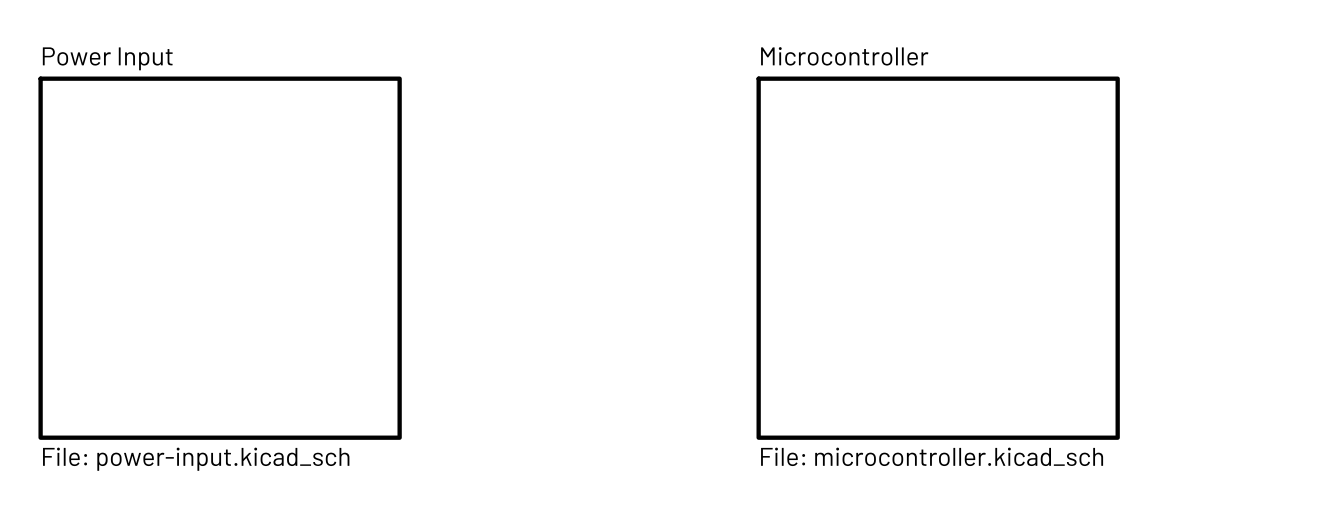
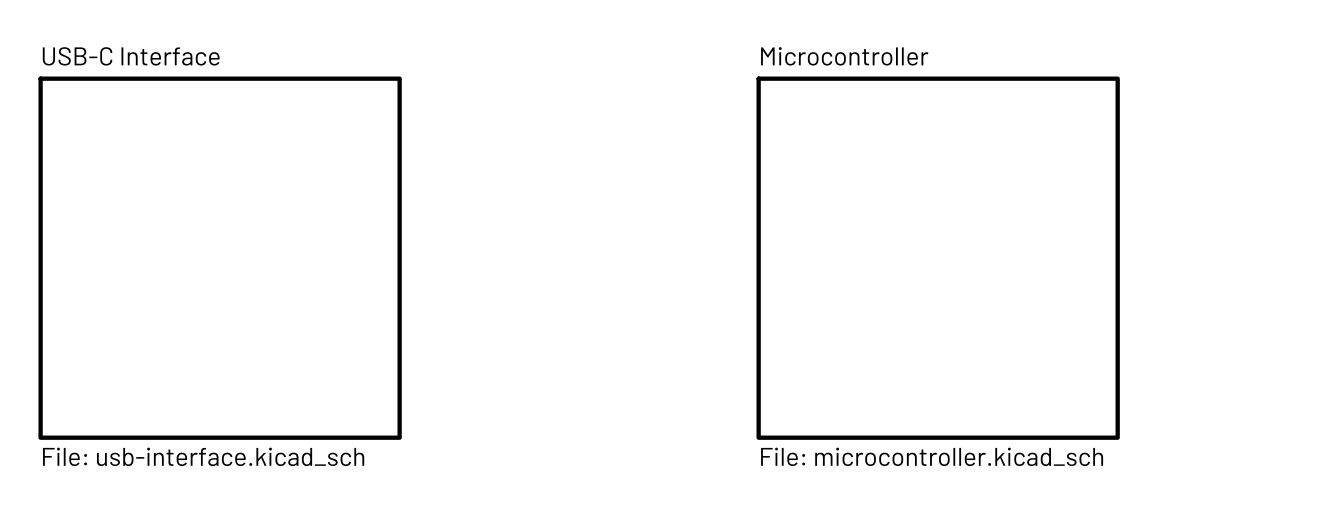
sheet Power Input name: Power Input (107, 58) -> USB-C Interface (131, 56)
sheet Power Input value: File: power-input.kicad_sch (196, 459) -> File: usb-interface.kicad_sch (203, 456)

